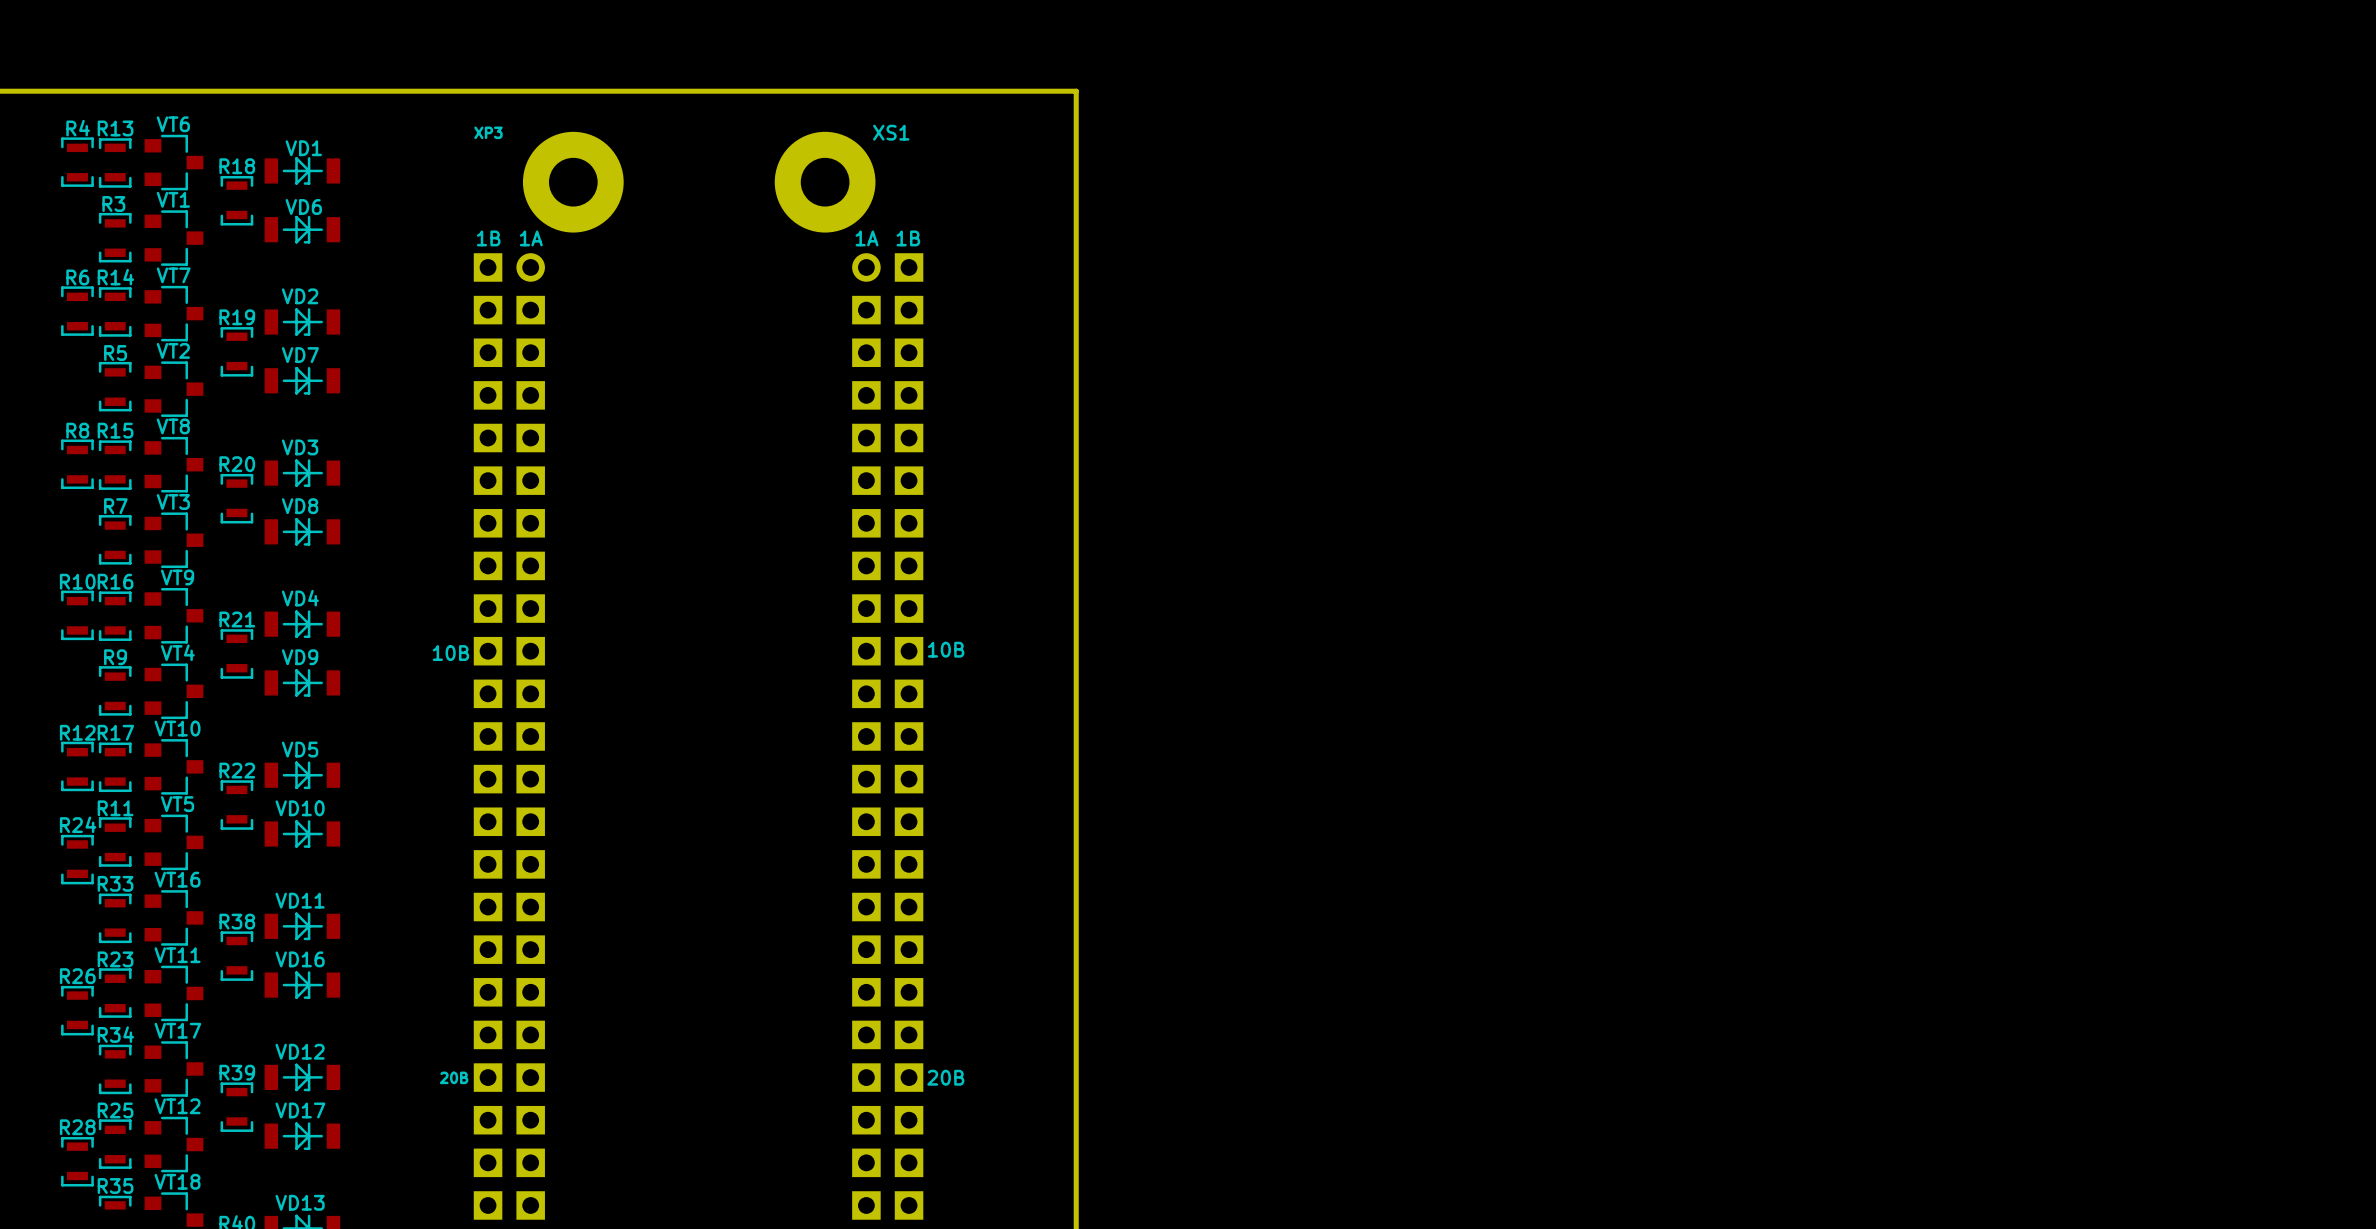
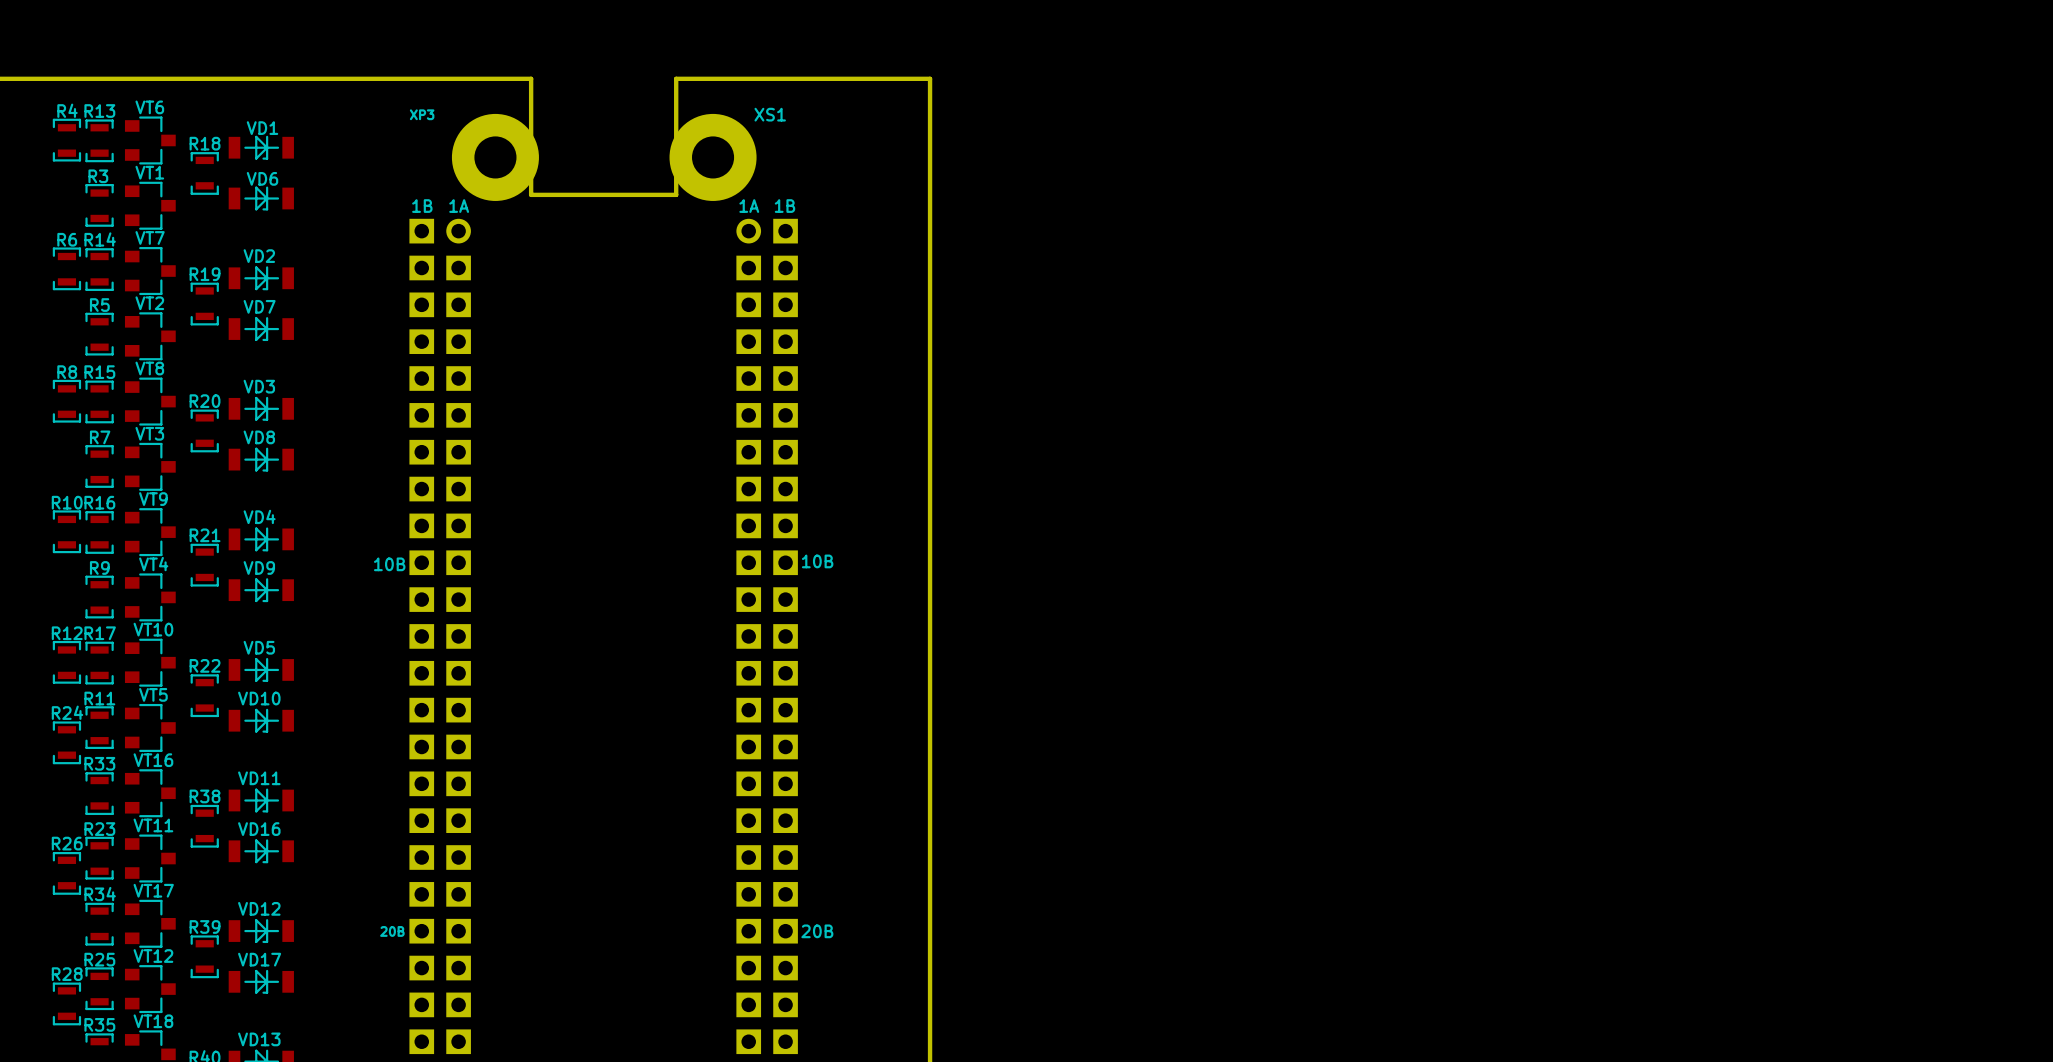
board edge: (614, 91) (782, 91) -> (531, 78) (531, 194) (676, 194) (676, 78)

